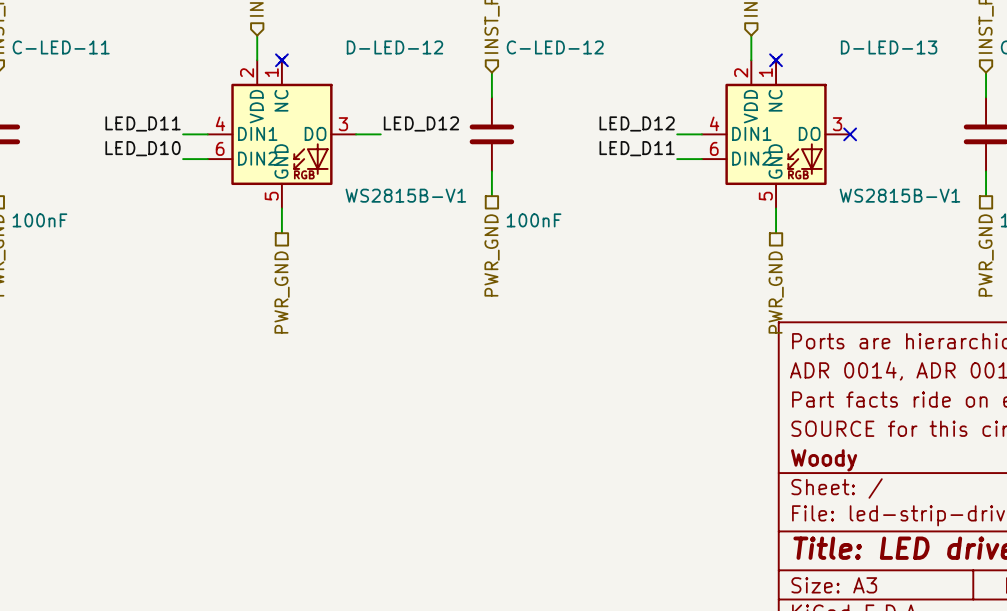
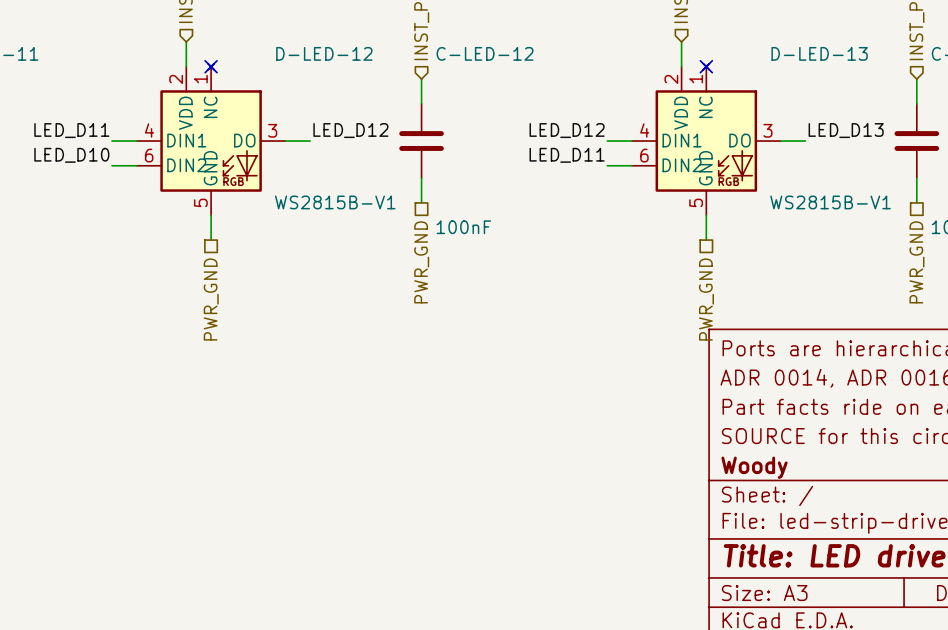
label: none -> LED_D13 (846, 130)
wire: none -> (780, 141) (805, 141)
no-connect mark: (850, 134) -> none

